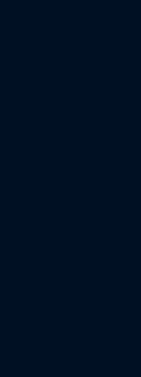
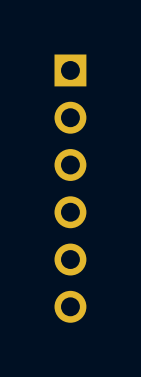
part: none -> (70, 188)

